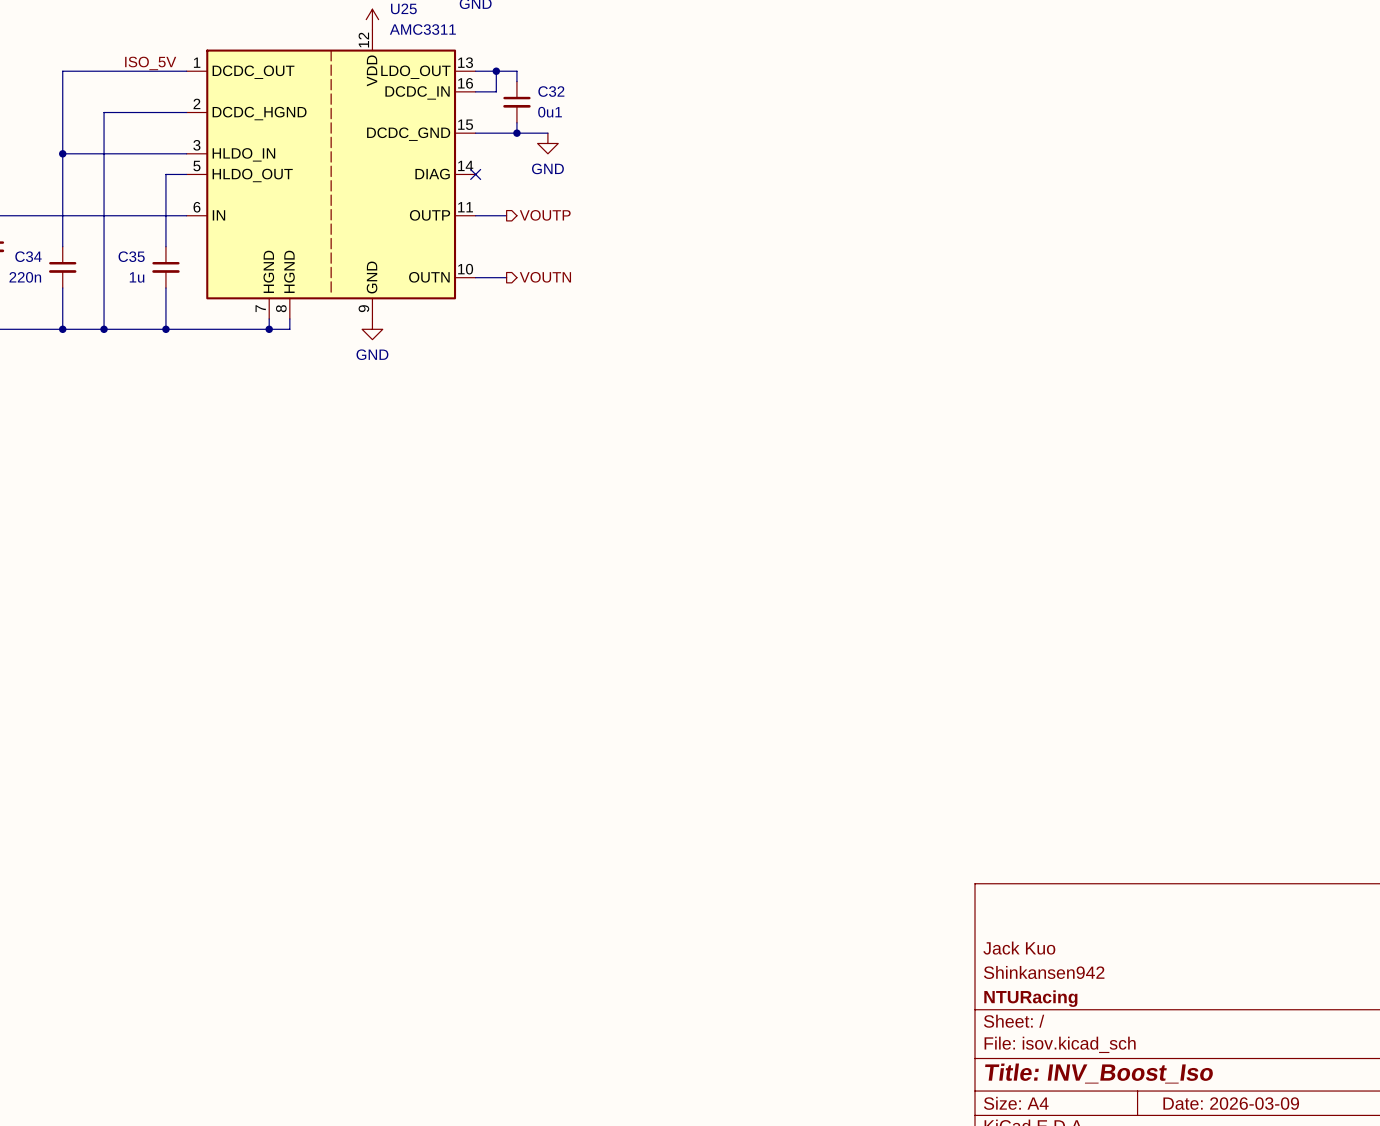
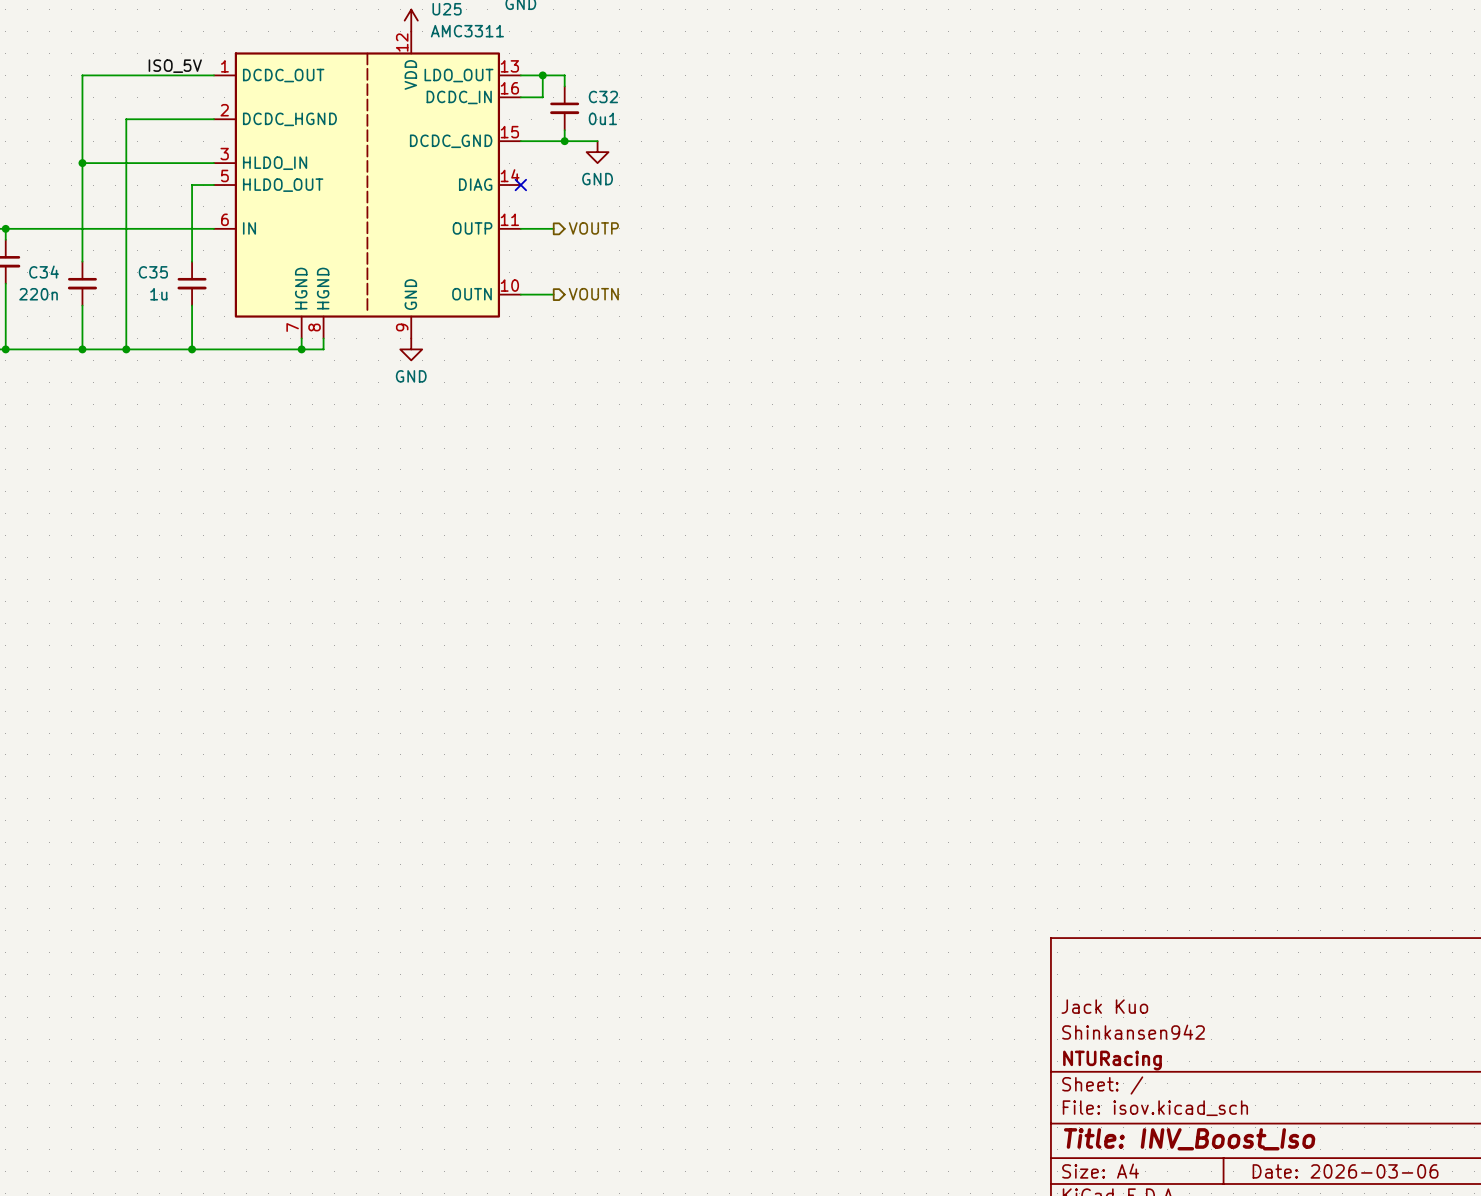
title block: Date: 2026-03-09 (1231, 1103) -> Date: 2026-03-06 (1345, 1171)

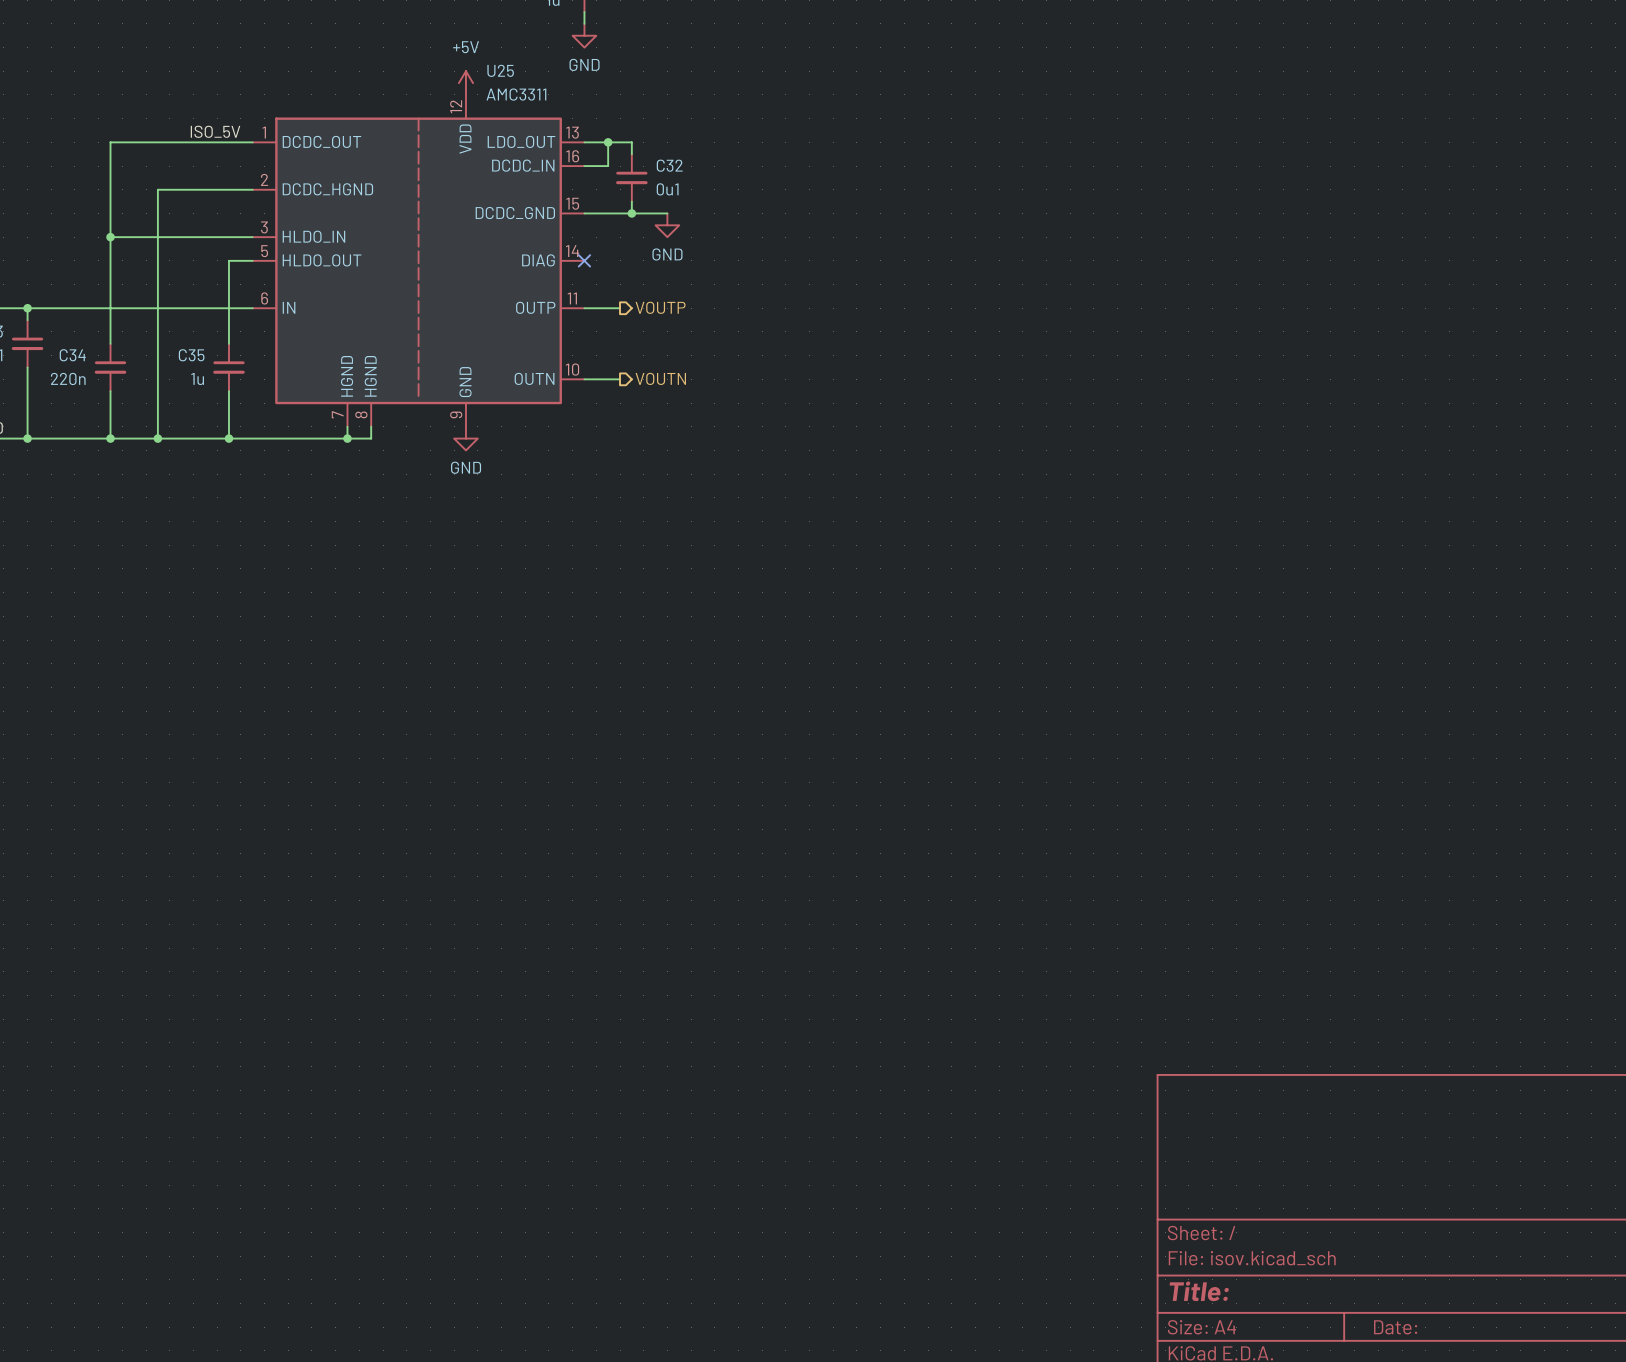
title block: Jack Kuo (1104, 1006) -> none
title block: Shinkansen942 (1133, 1032) -> none
title block: NTURacing (1112, 1060) -> none
title block: Title: INV_Boost_Iso (1189, 1139) -> Title: (1199, 1291)
title block: Date: 2026-03-06 (1345, 1171) -> Date: (1395, 1327)

